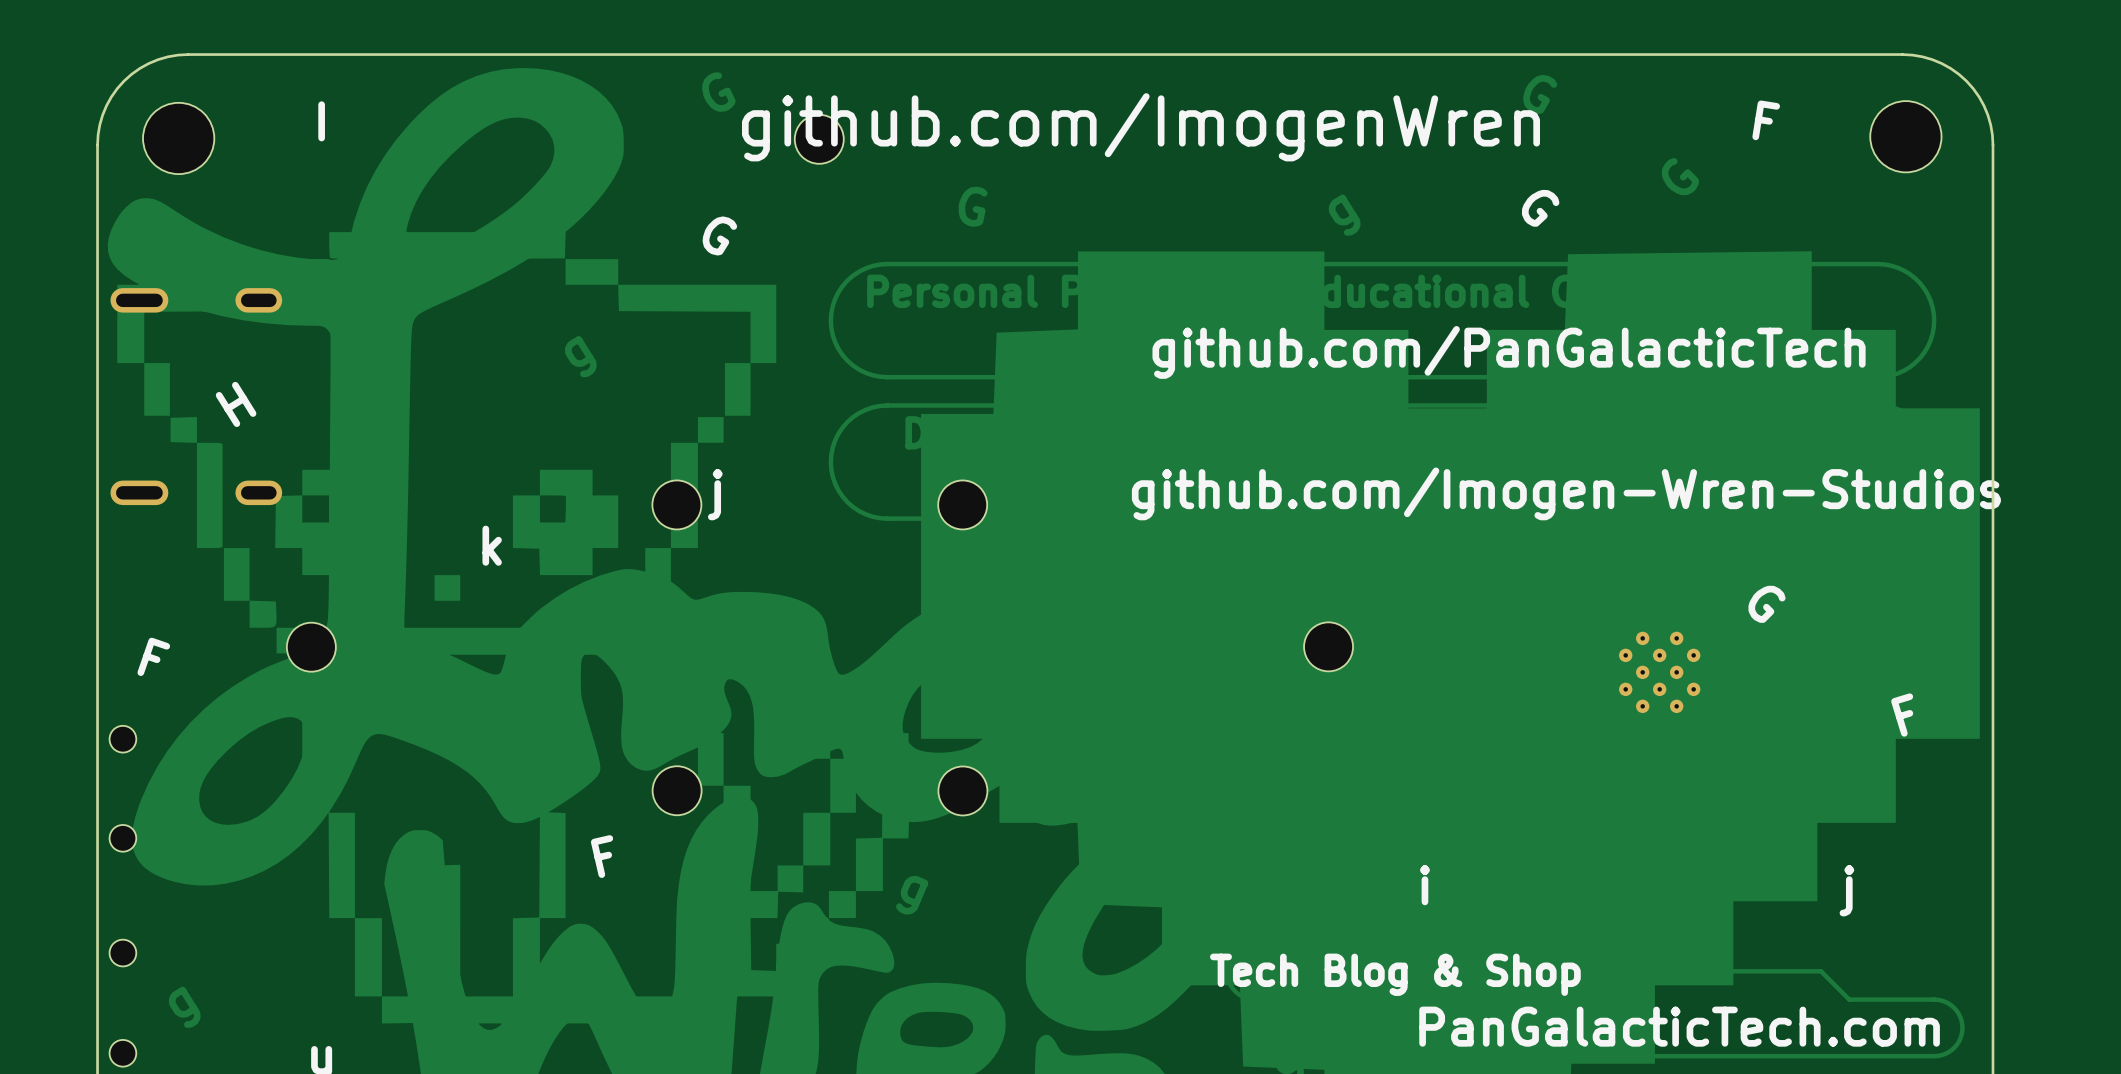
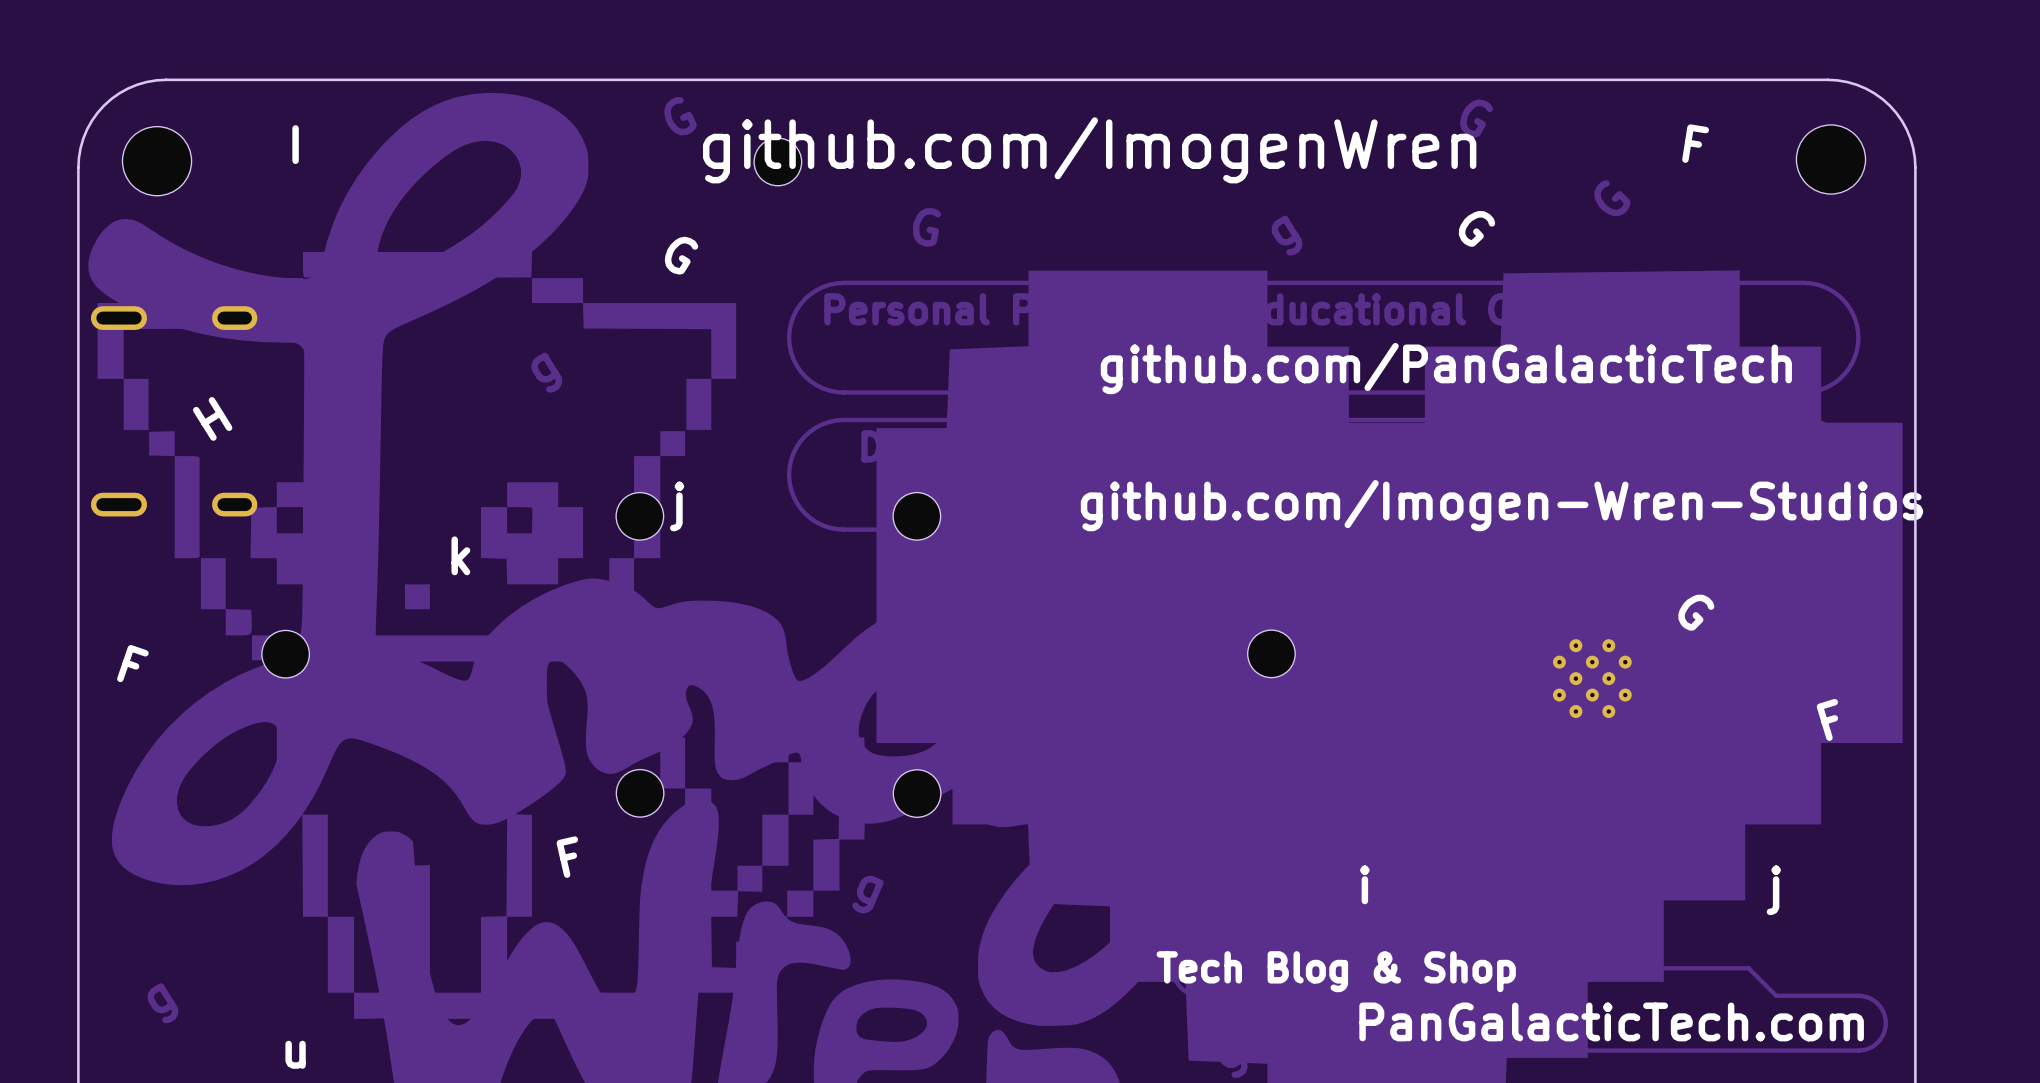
part: (122, 739) -> none
part: (122, 838) -> none
part: (122, 953) -> none
part: (122, 1053) -> none

